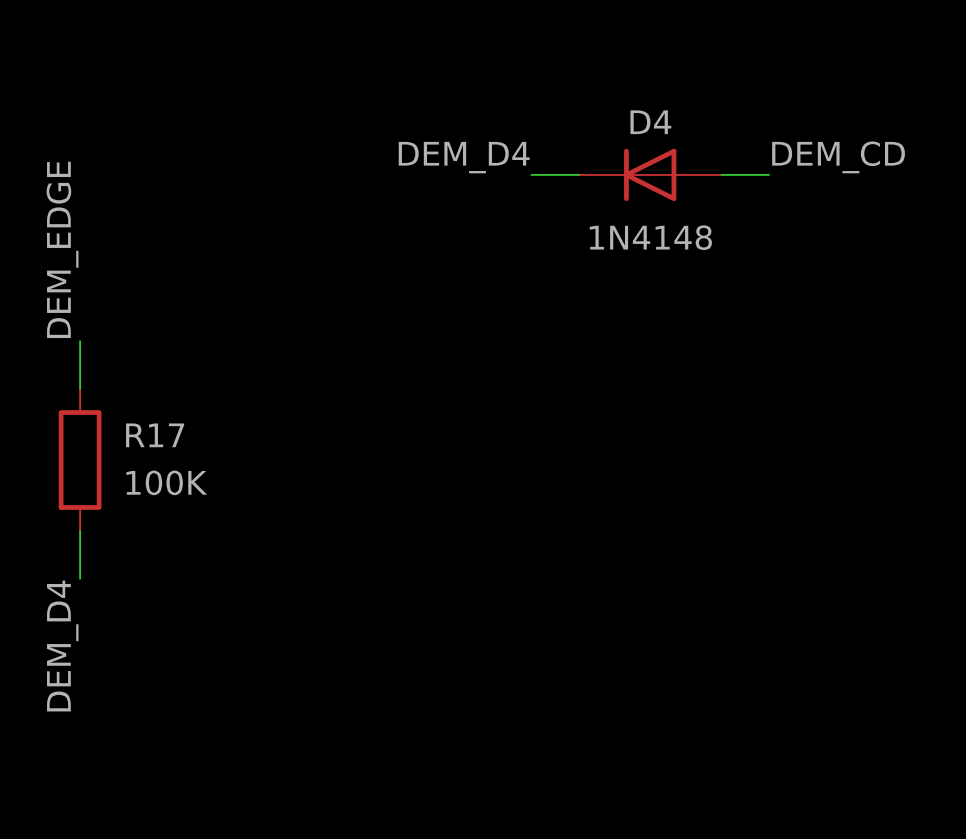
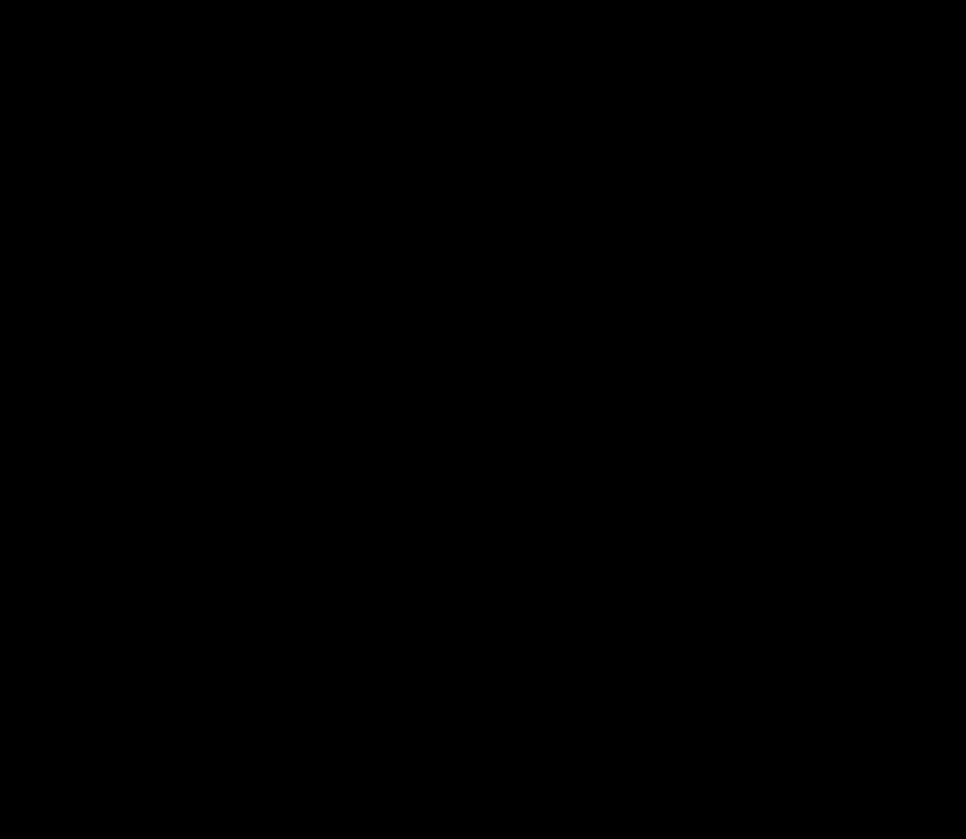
label: DEM_D4 (464, 157) -> none
label: DEM_CD (838, 157) -> none
wire: (531, 174) (578, 174) -> none
D4: 1N4148 (650, 174) -> none
wire: (721, 174) (768, 174) -> none
label: DEM_EDGE (62, 249) -> none
wire: (80, 341) (80, 388) -> none
R17: 100K (80, 459) -> none
wire: (80, 531) (80, 578) -> none
label: DEM_D4 (62, 646) -> none

